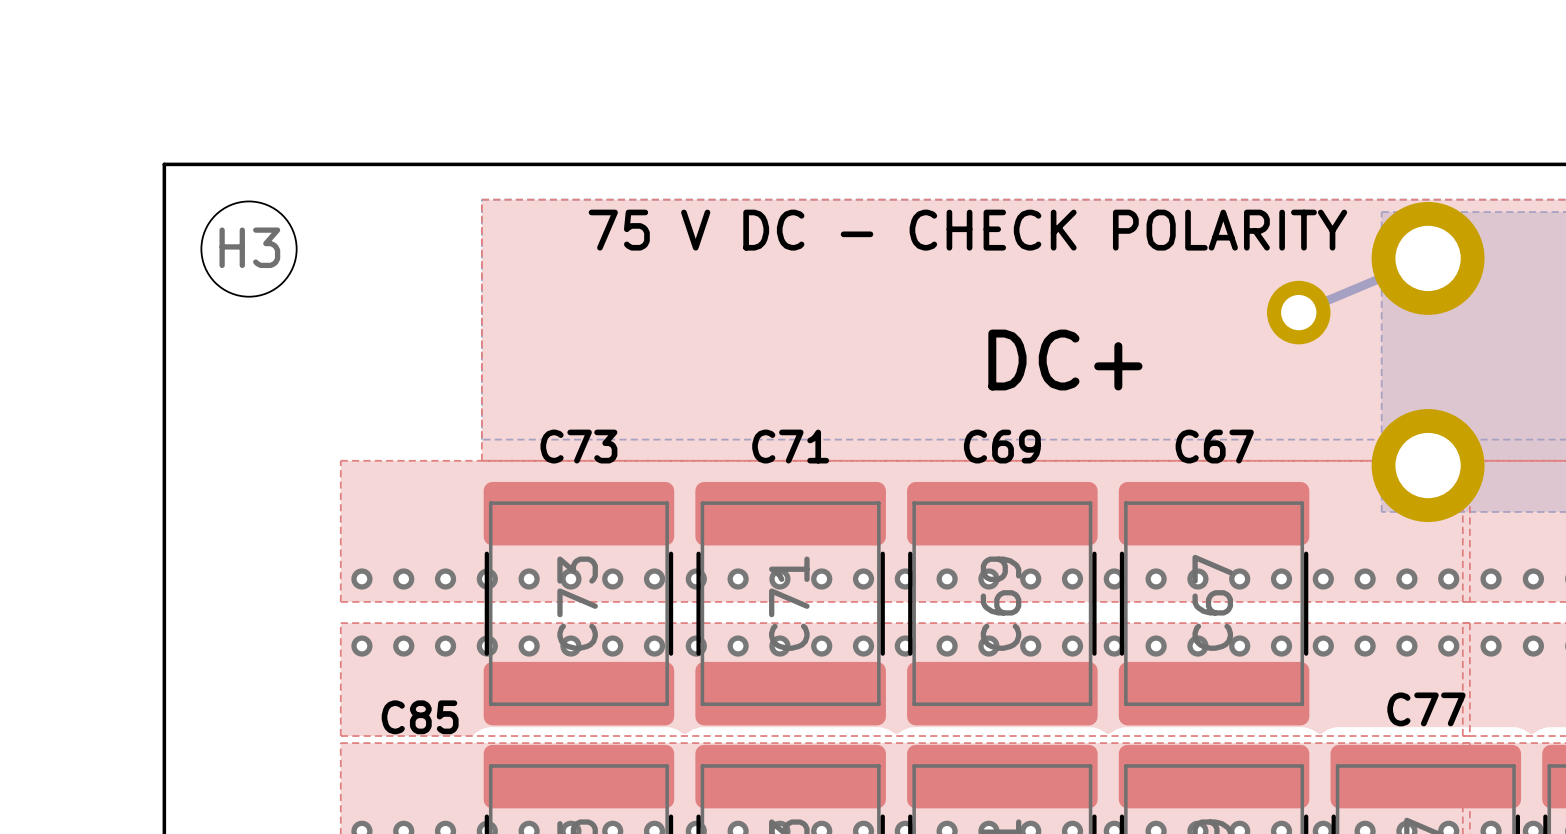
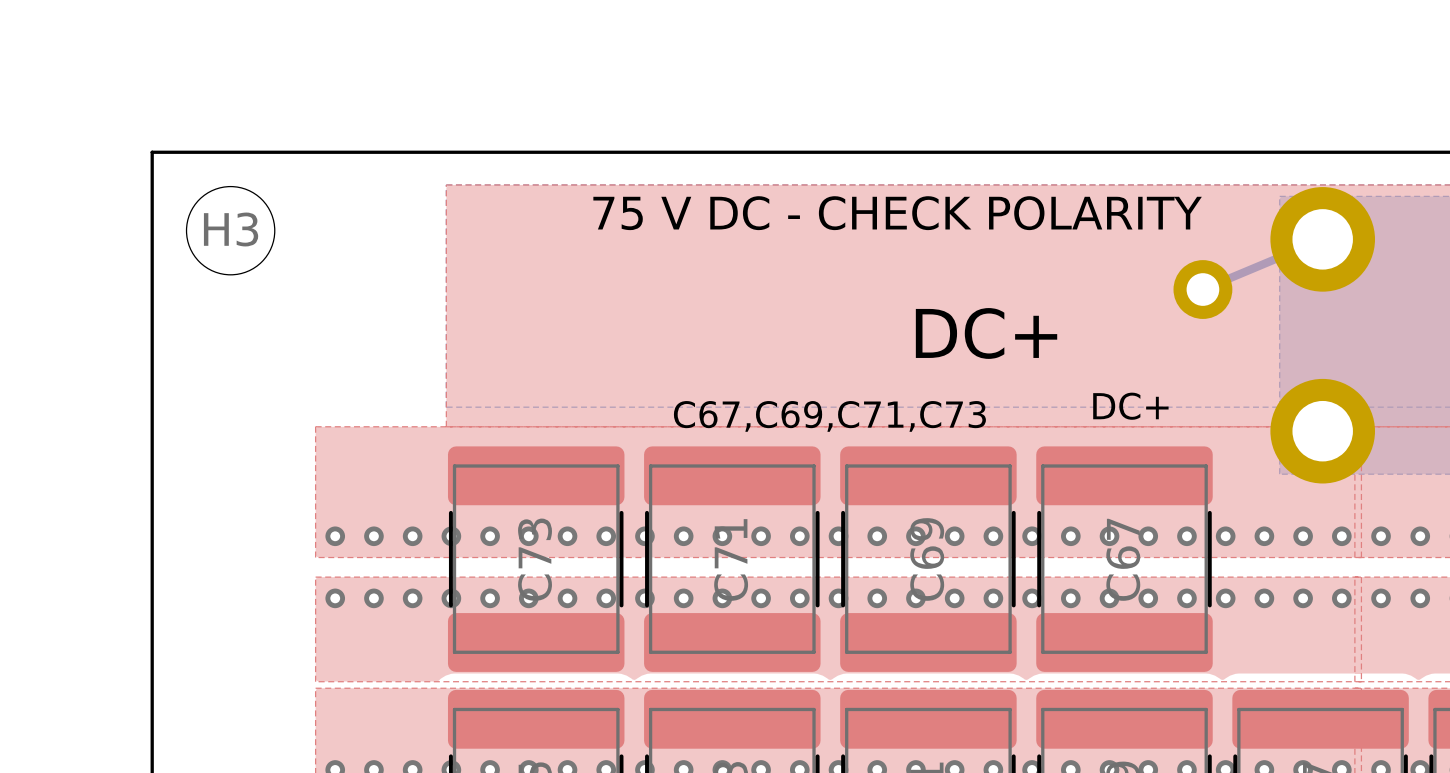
text: C73 (578, 446) -> none
text: C71 (790, 446) -> none
text: C69 (1002, 446) -> none
text: C67 (1214, 446) -> DC+ (1130, 406)
text: none -> C67,C69,C71,C73 (829, 416)
text: C77 (1426, 709) -> none
text: C85 (420, 717) -> none

